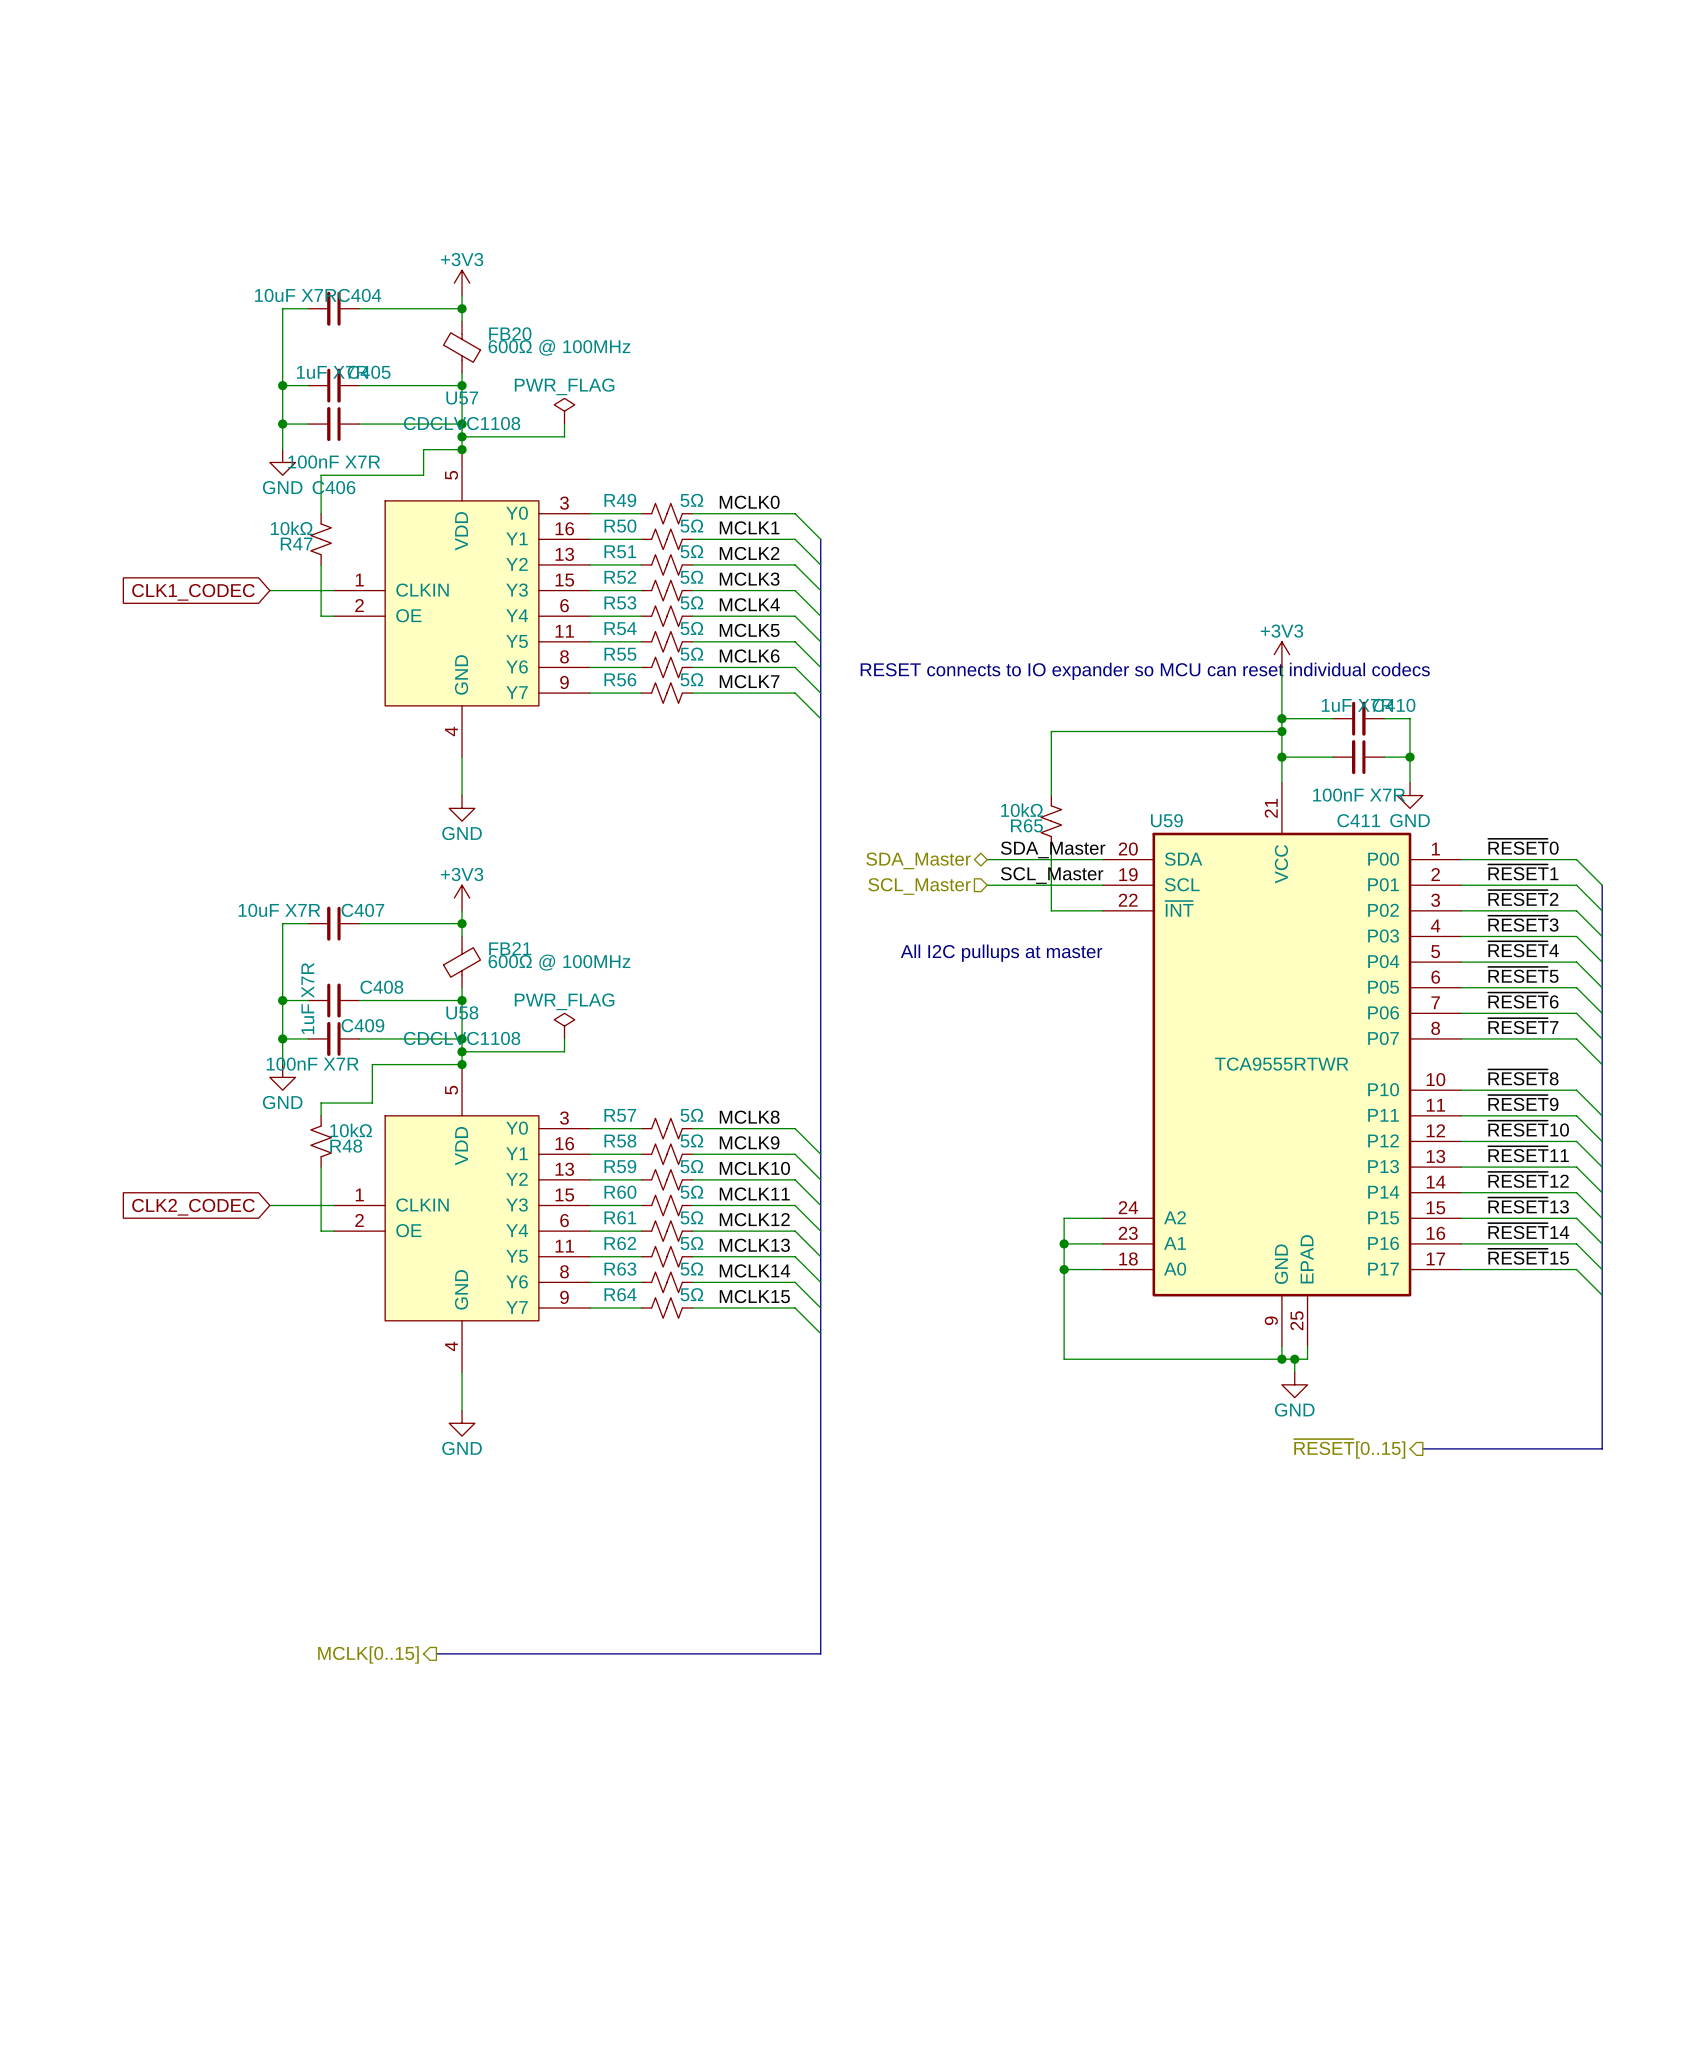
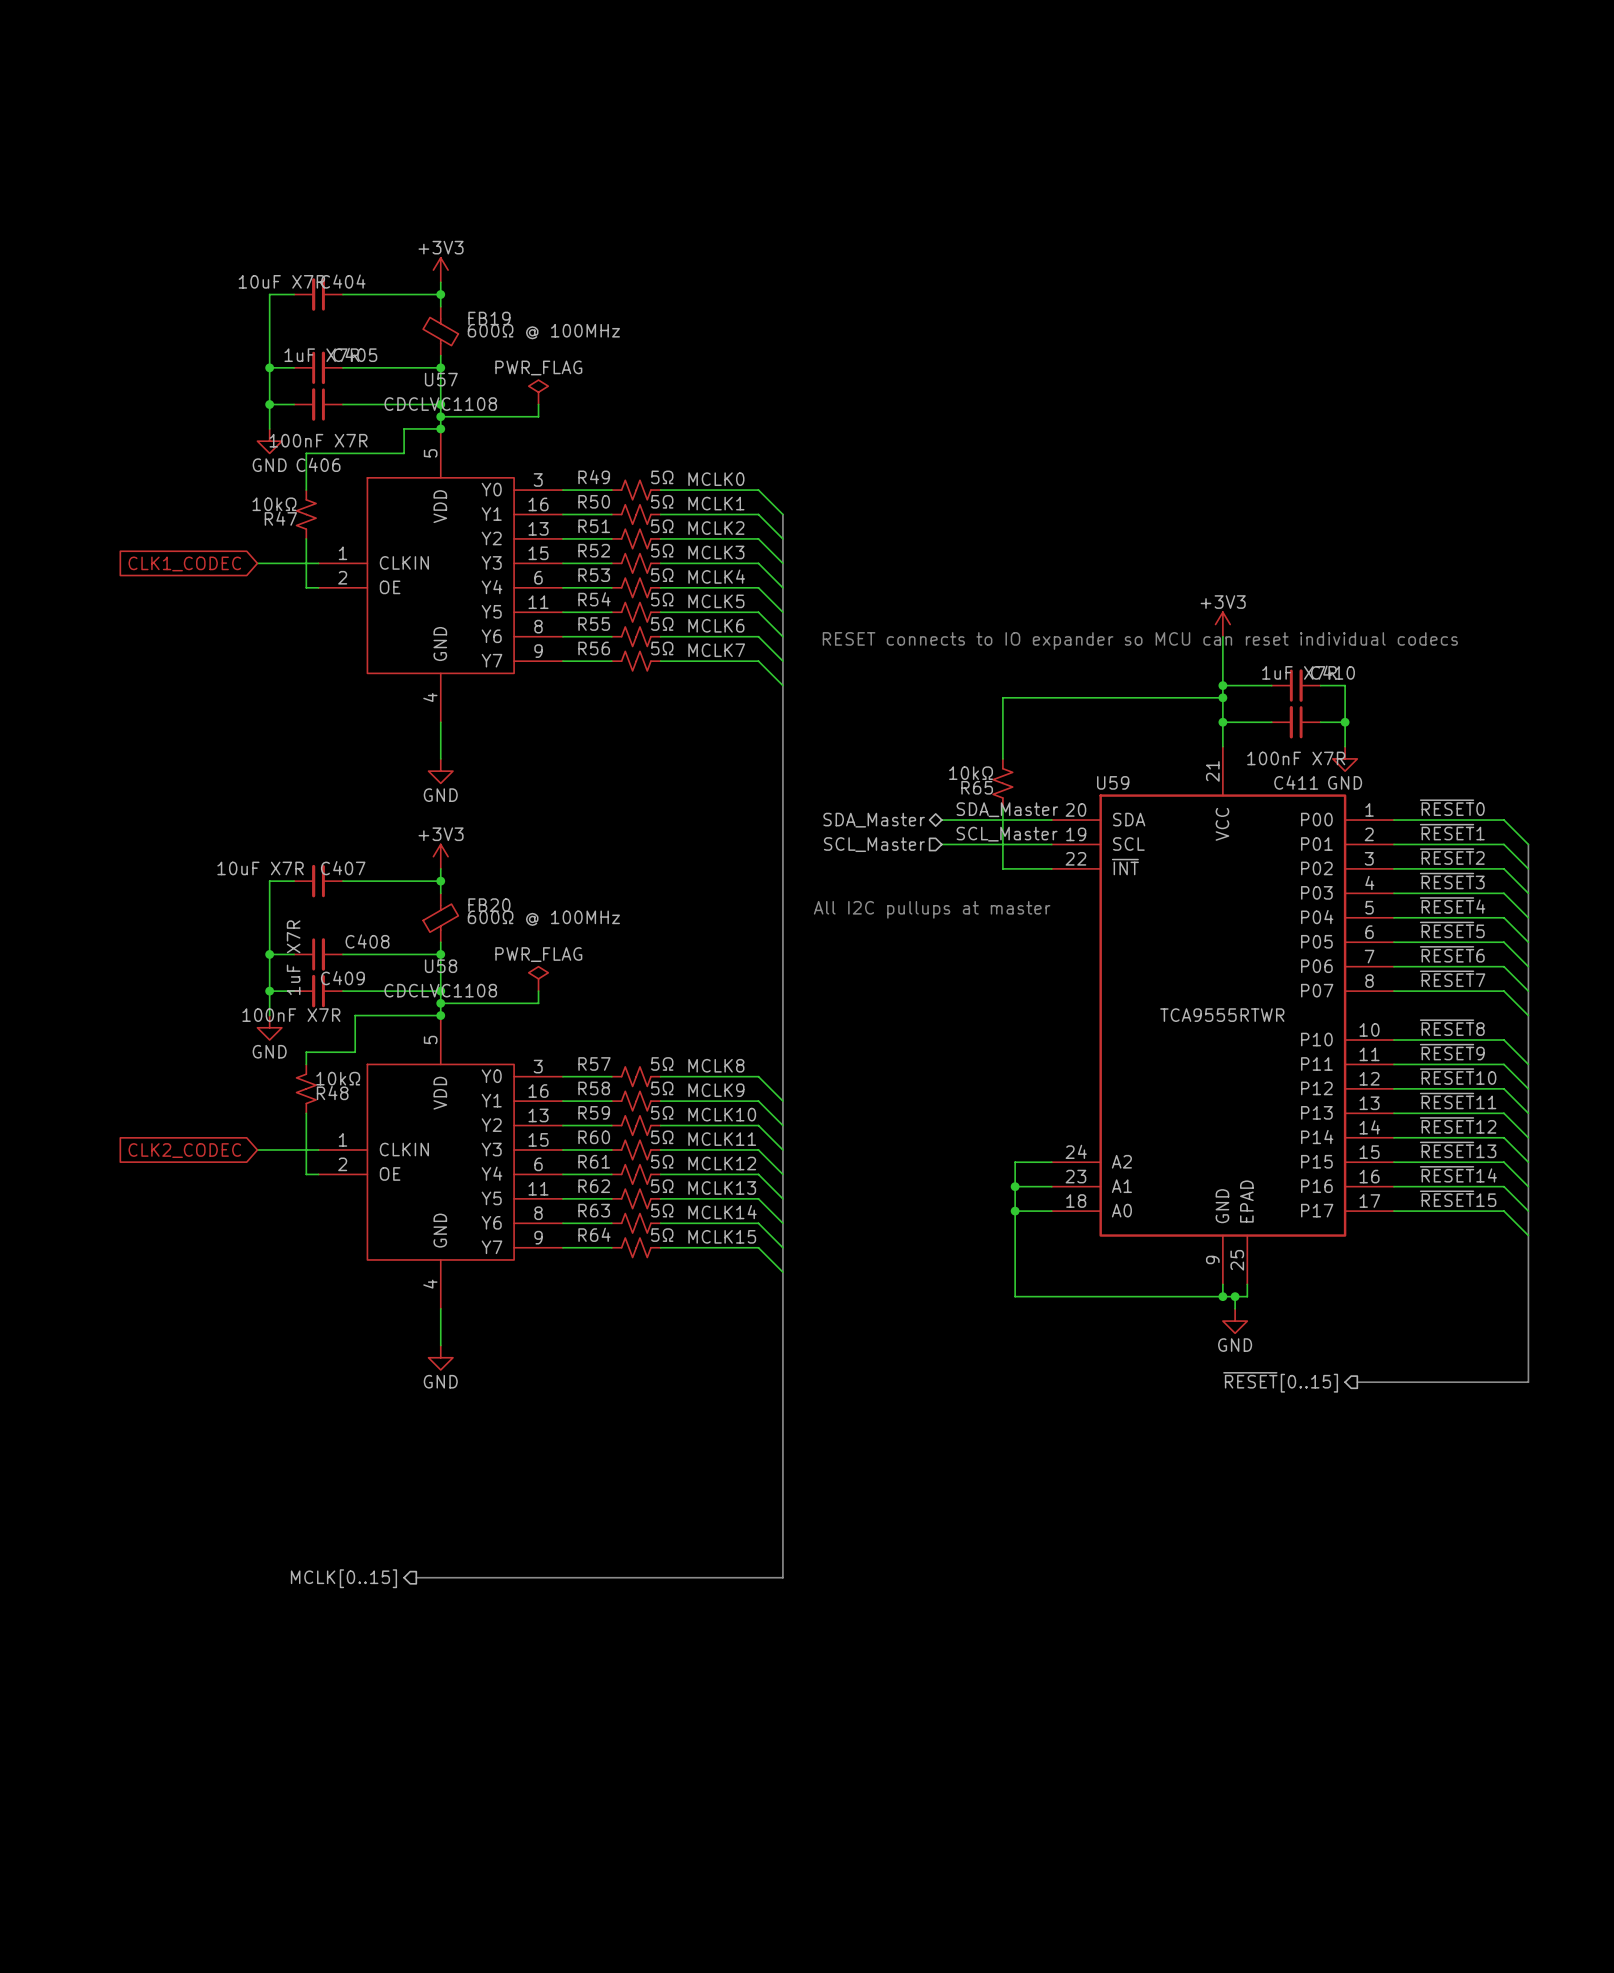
FB20 name: FB20 (510, 333) -> FB19 (489, 318)
FB21 name: FB21 (510, 948) -> FB20 (489, 905)

